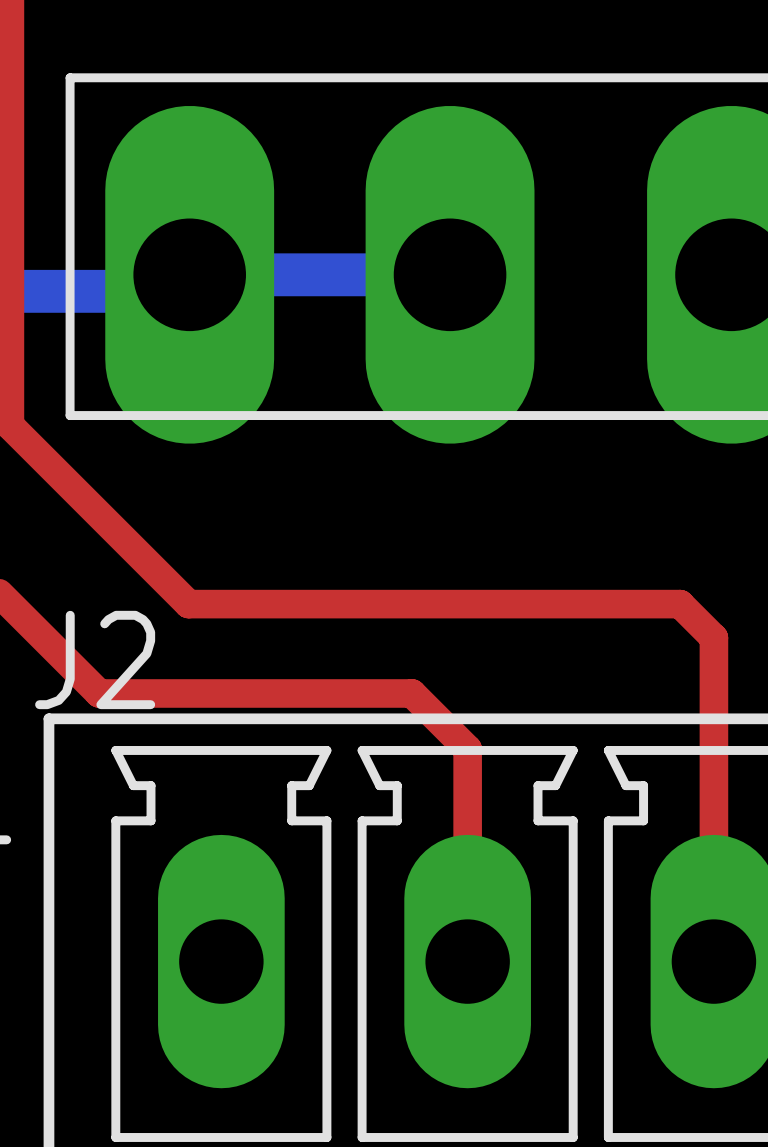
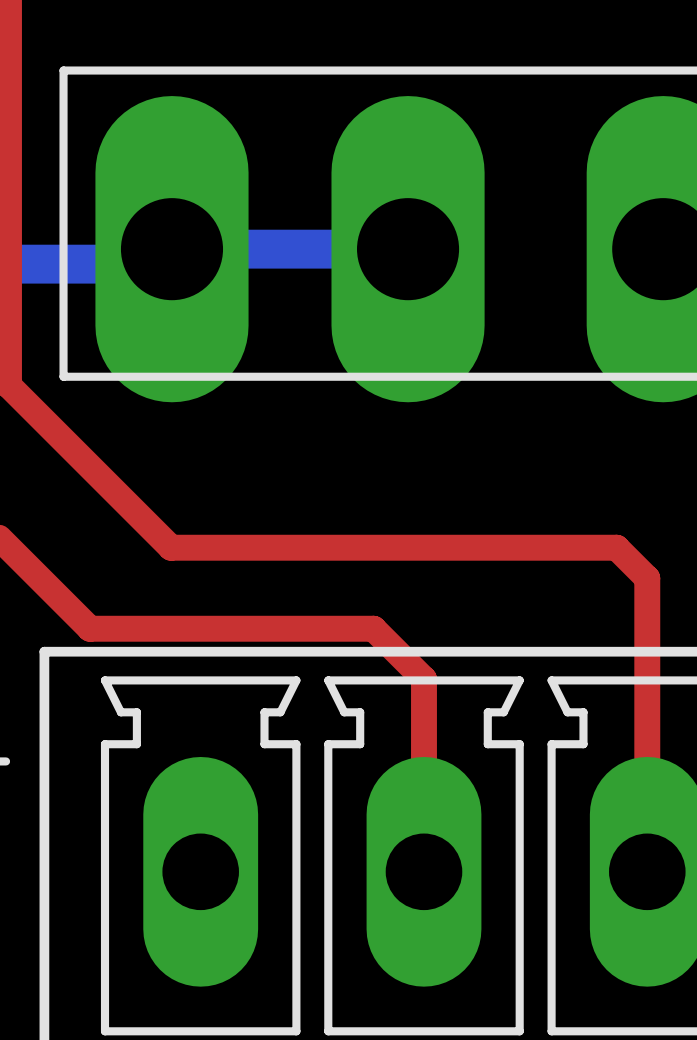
J2 name: J2 (95, 659) -> none

